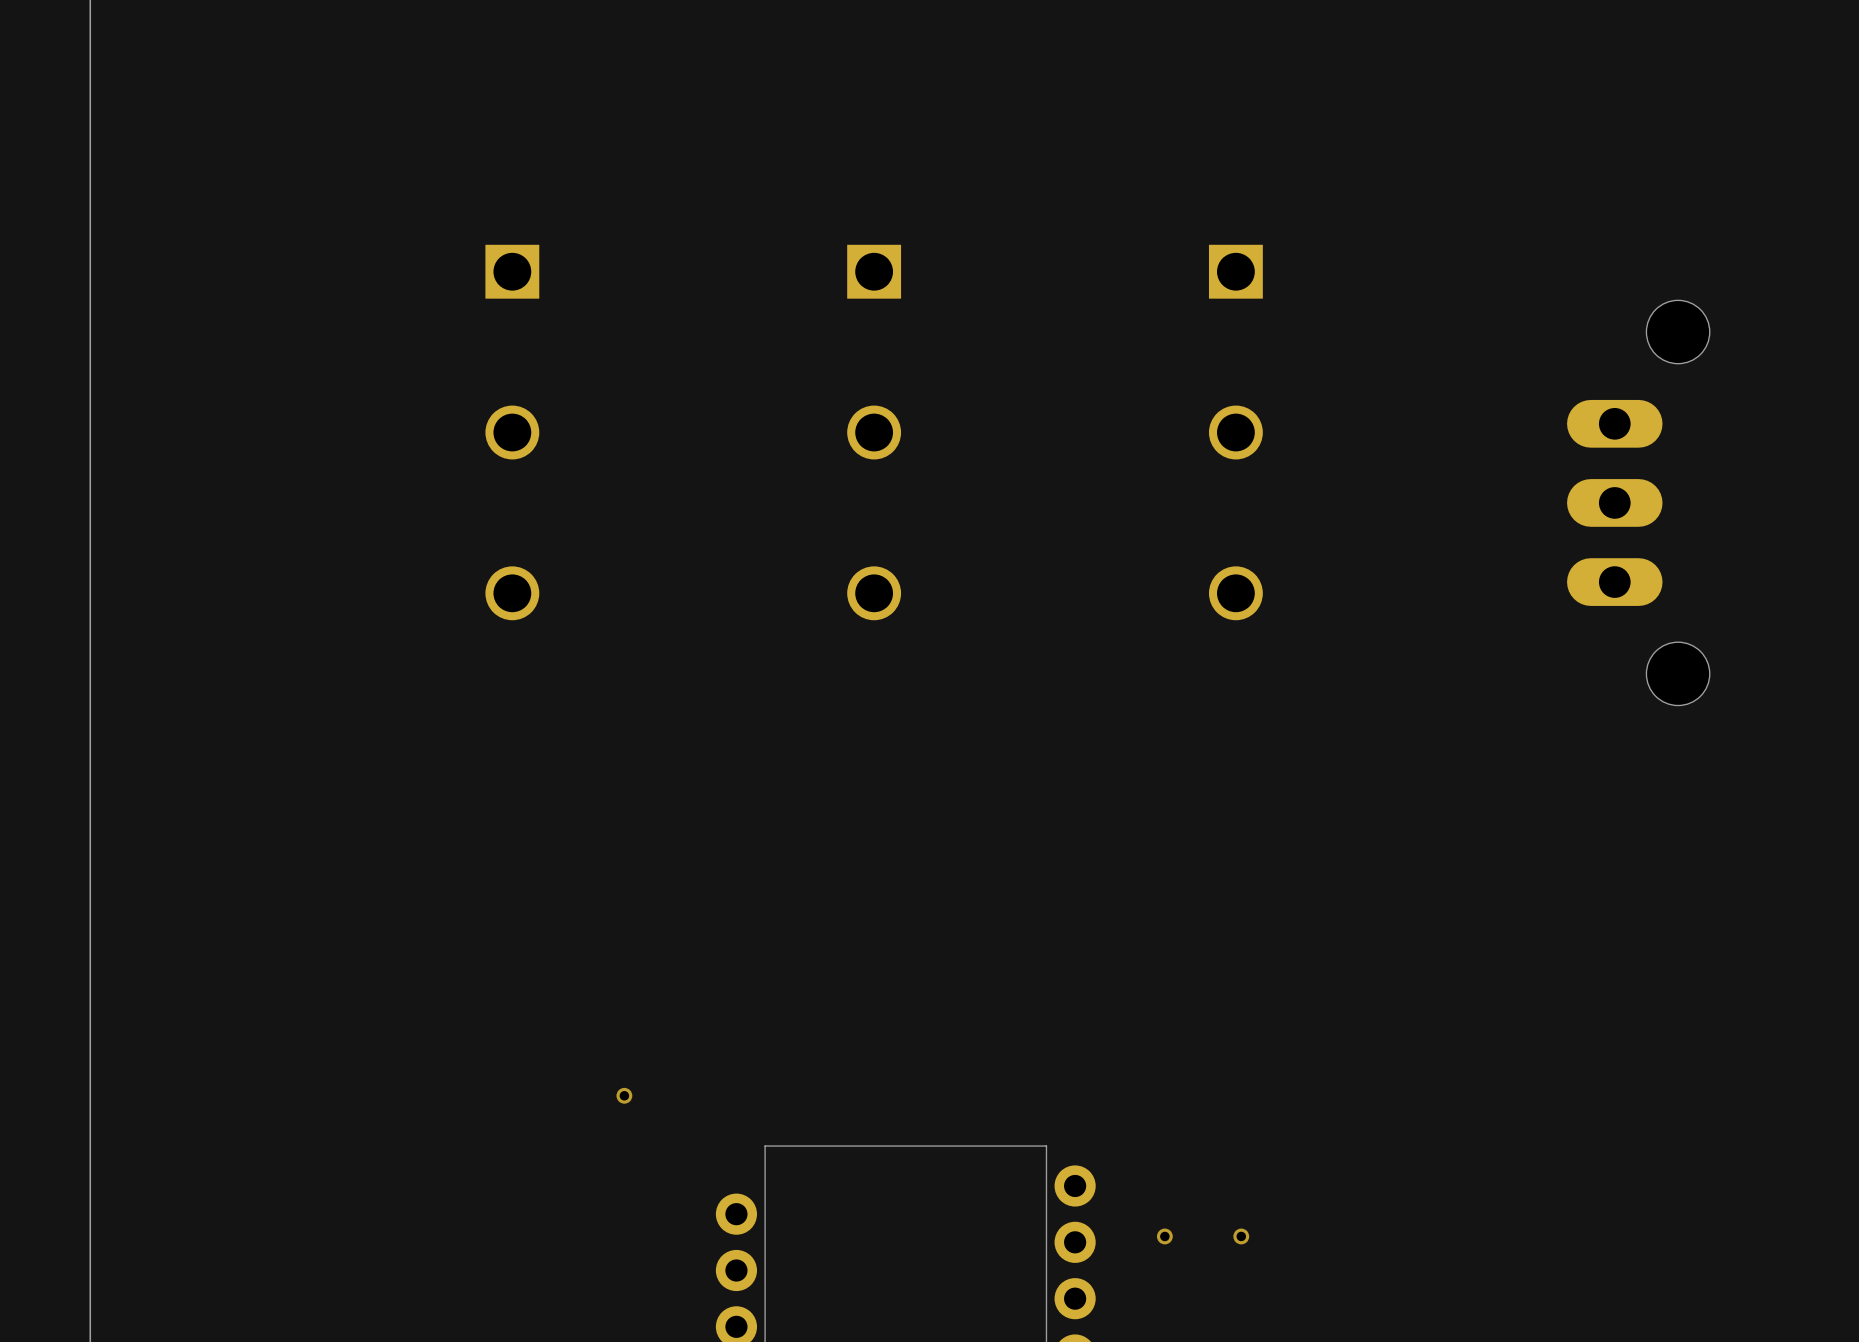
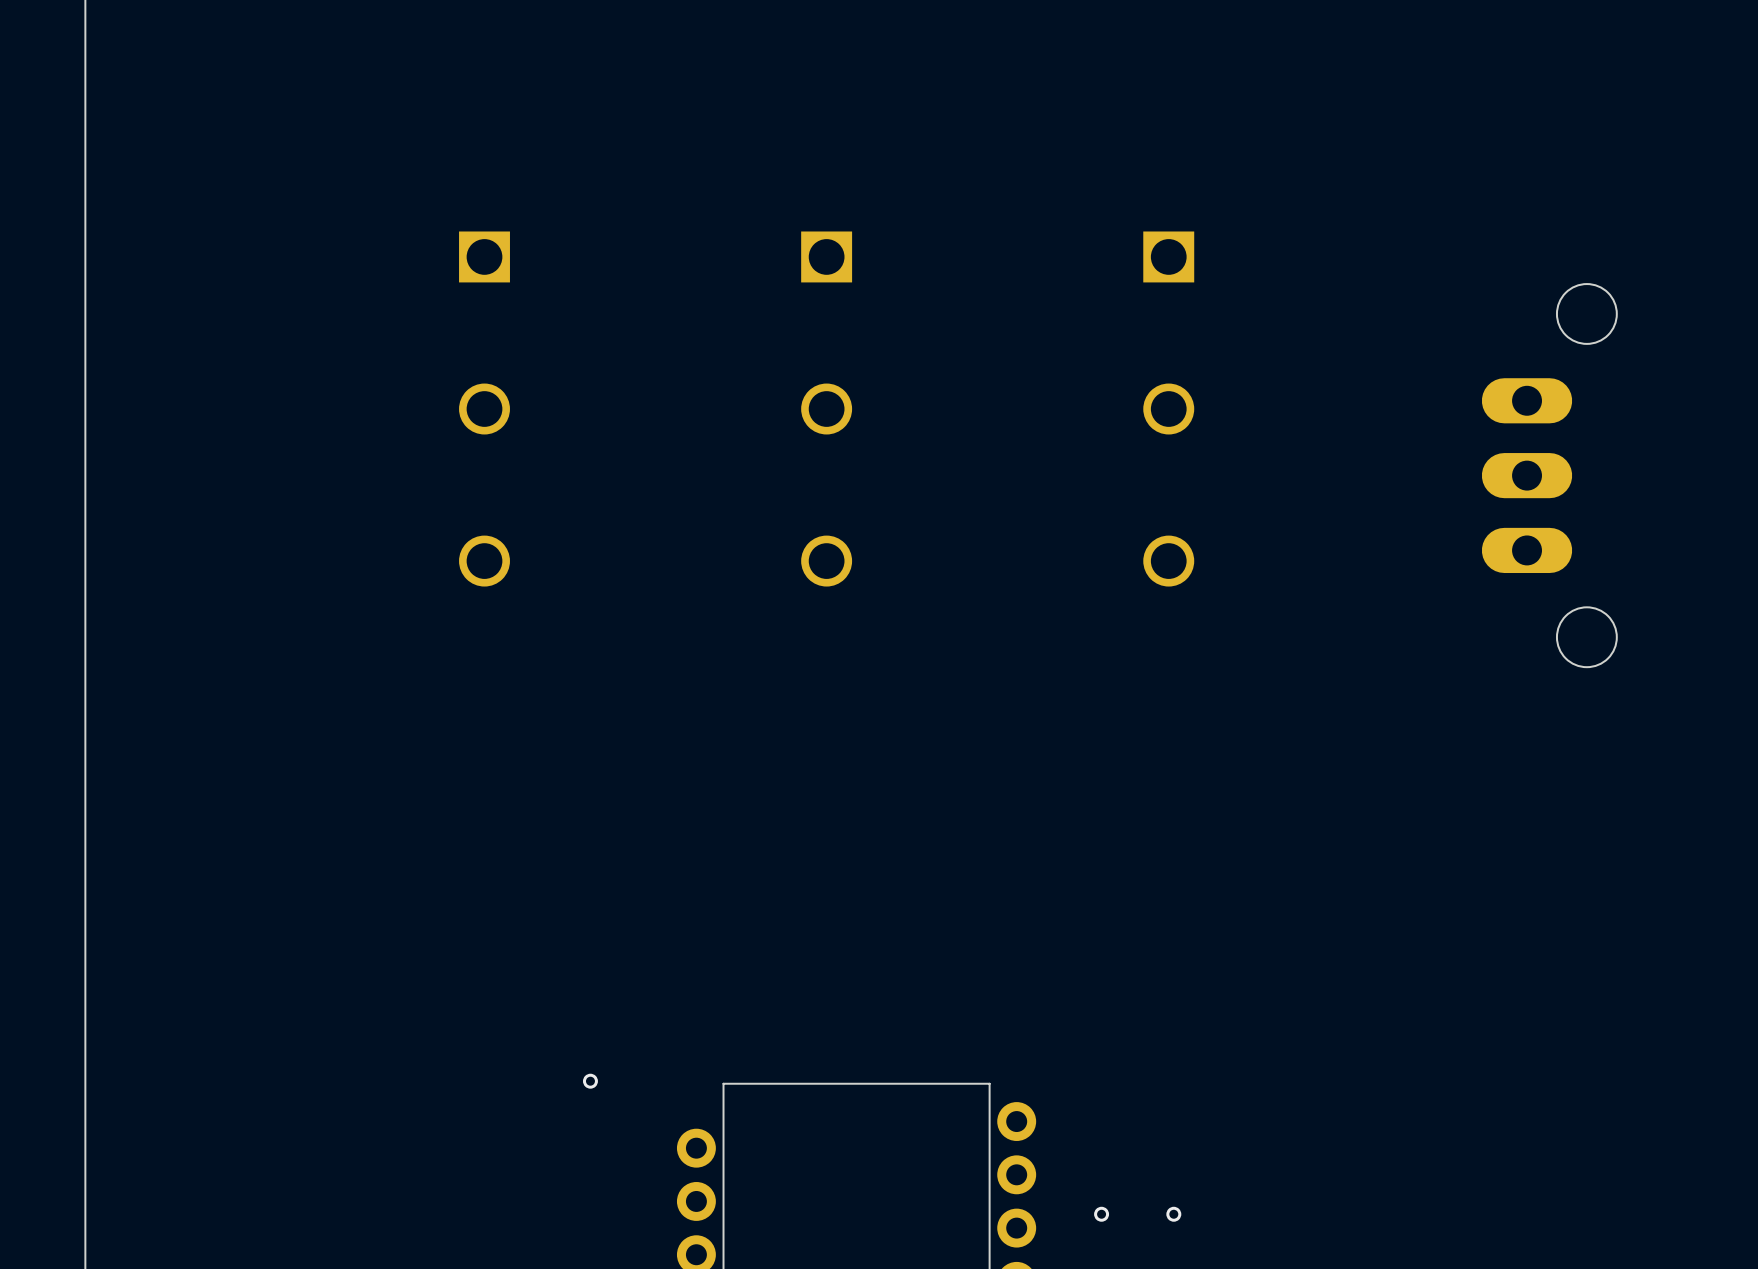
via position: (624, 1095) -> (590, 1081)
via: (1164, 1236) -> none
via: (1241, 1236) -> none
via: none -> (1101, 1214)
via: none -> (1173, 1214)

